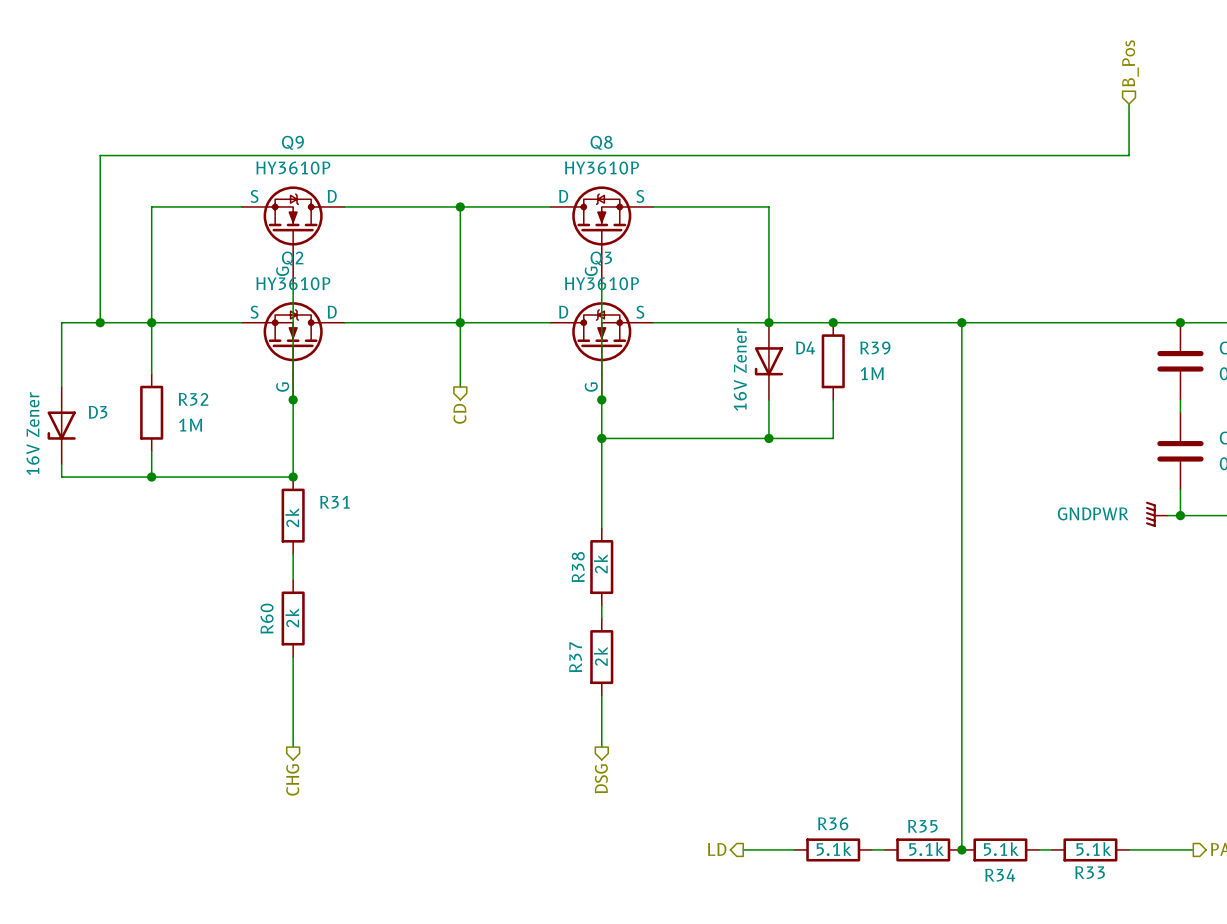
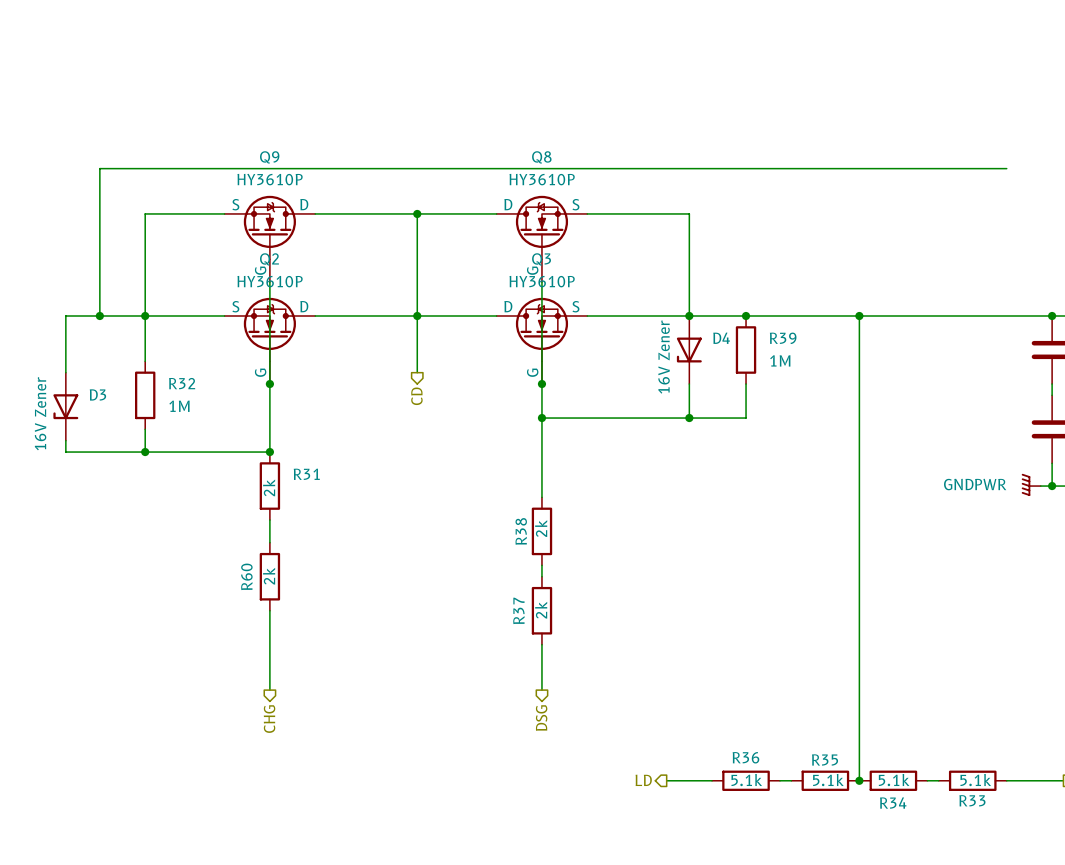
hierarchical label: B_Pos (1130, 63) -> none
wire: (1129, 104) (1129, 155) -> none

